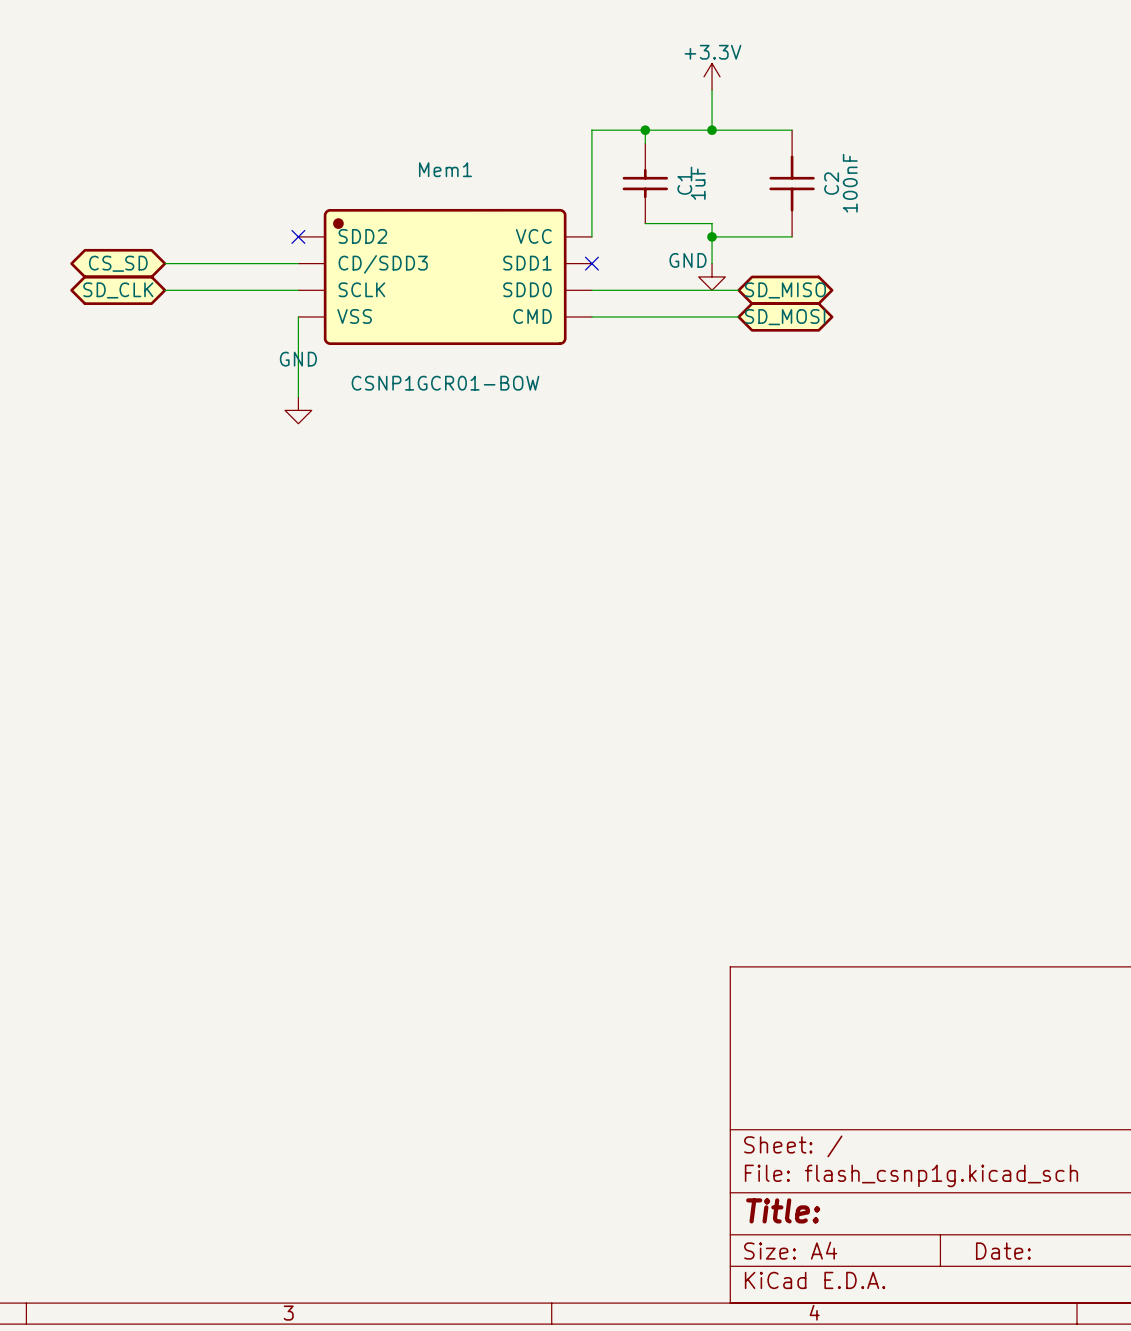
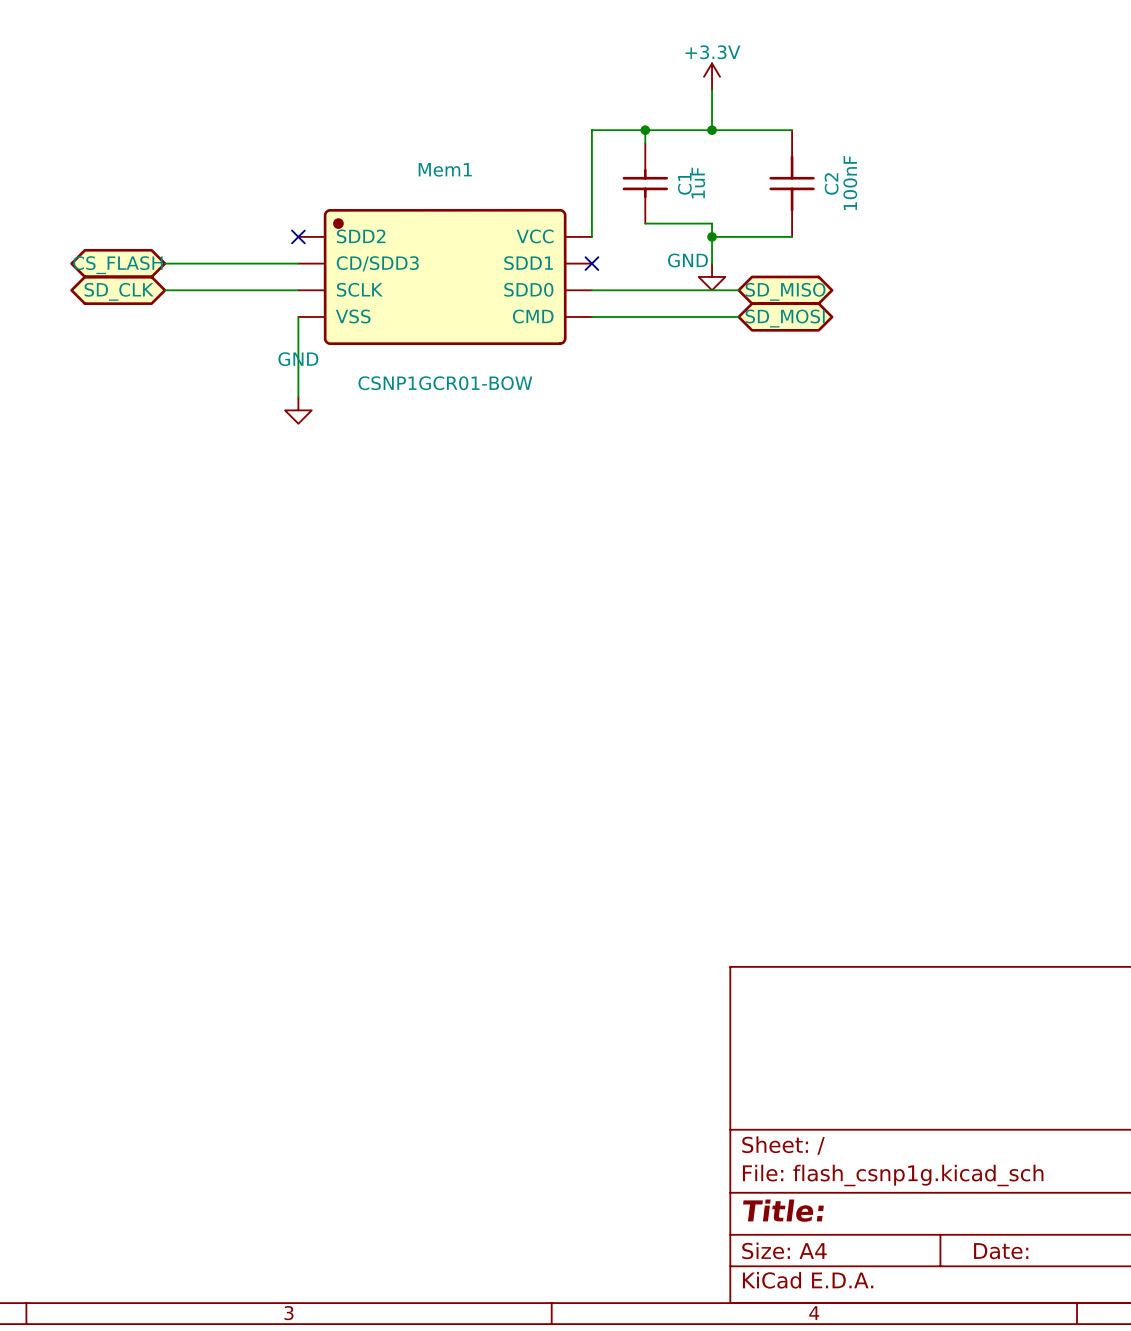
power symbol: CS_SD (118, 263) -> CS_FLASH (118, 263)

